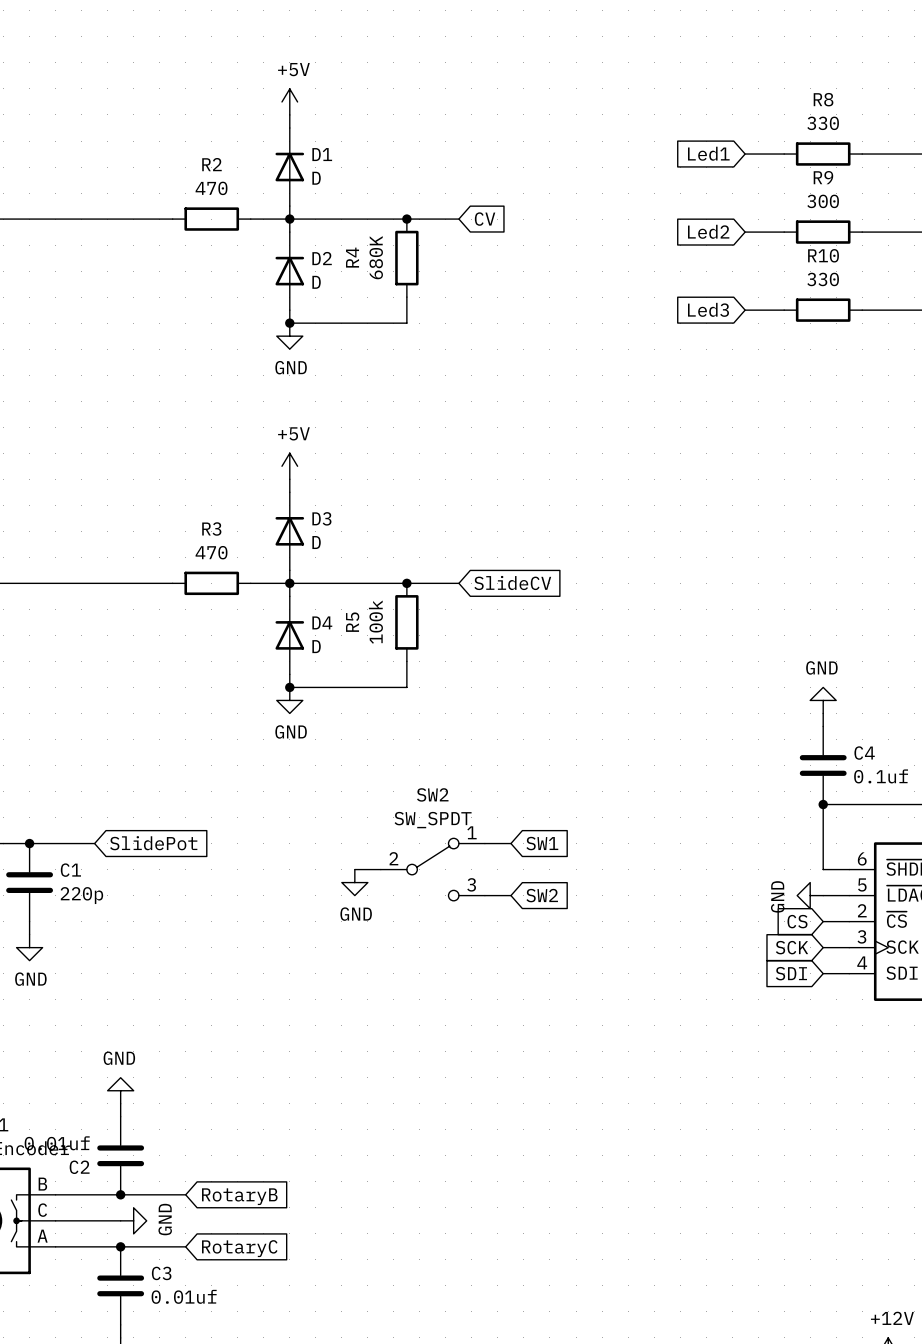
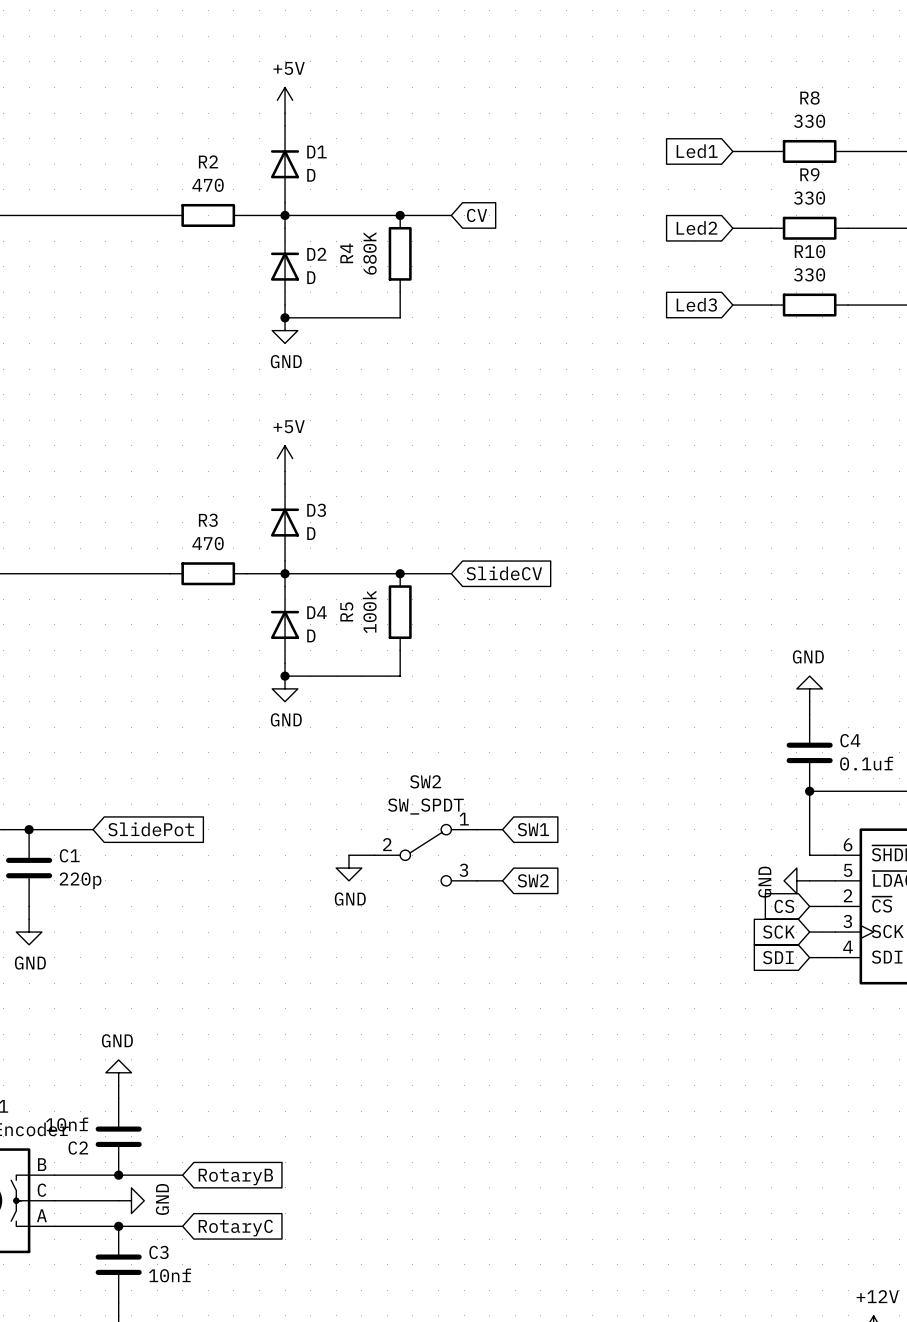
R9 value: 300 (823, 201) -> 330 (809, 198)
C2 value: 0.01uf (57, 1143) -> 10nf (67, 1124)
C3 value: 0.01uf (184, 1296) -> 10nf (170, 1275)

